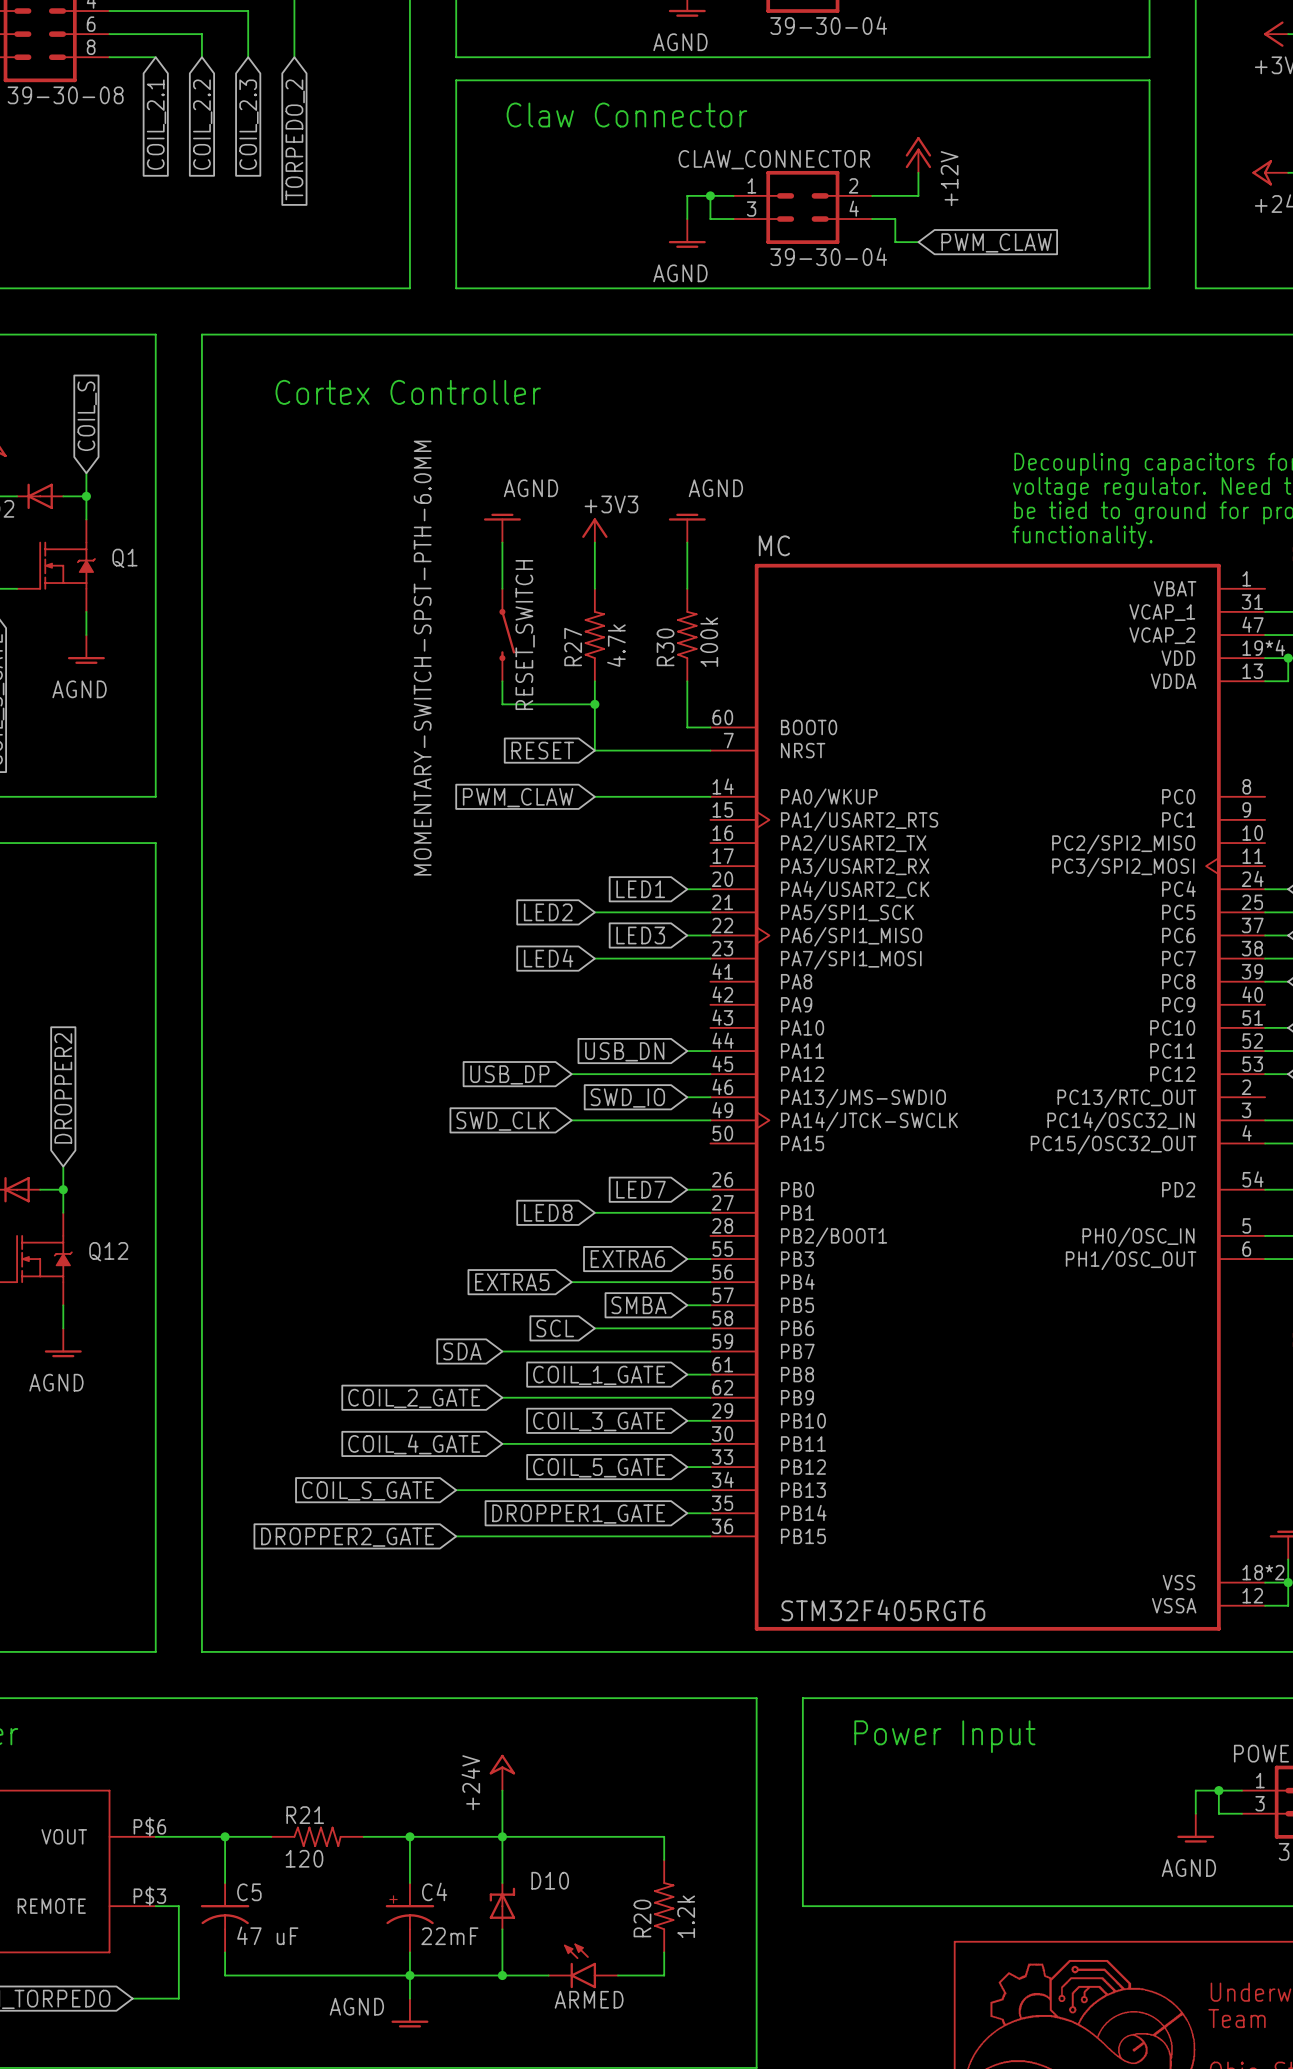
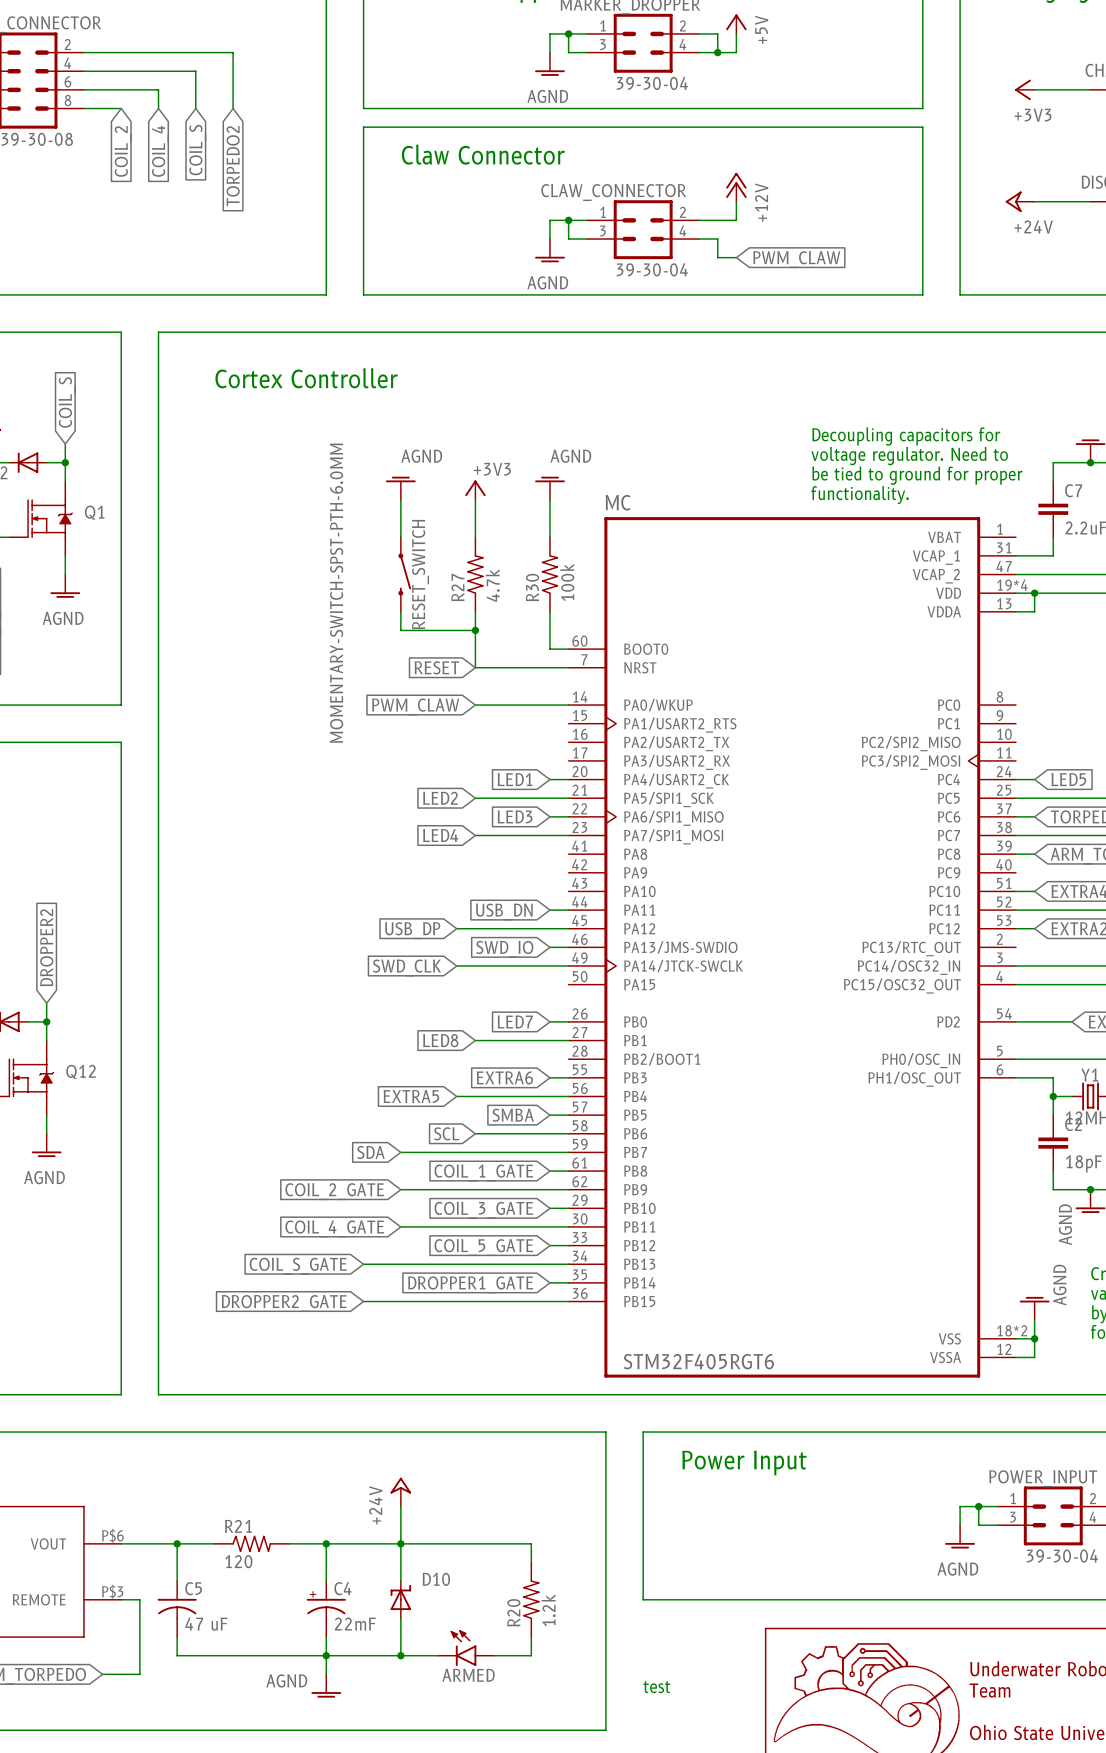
global label: COIL_2.1 (156, 124) -> COIL_2 (123, 151)
global label: COIL_2.2 (202, 124) -> COIL_4 (160, 151)
global label: COIL_2.3 (248, 124) -> COIL_S (197, 150)
global label: TORPEDO_2 (295, 139) -> TORPEDO2 (233, 166)
text: none -> test (656, 1686)

